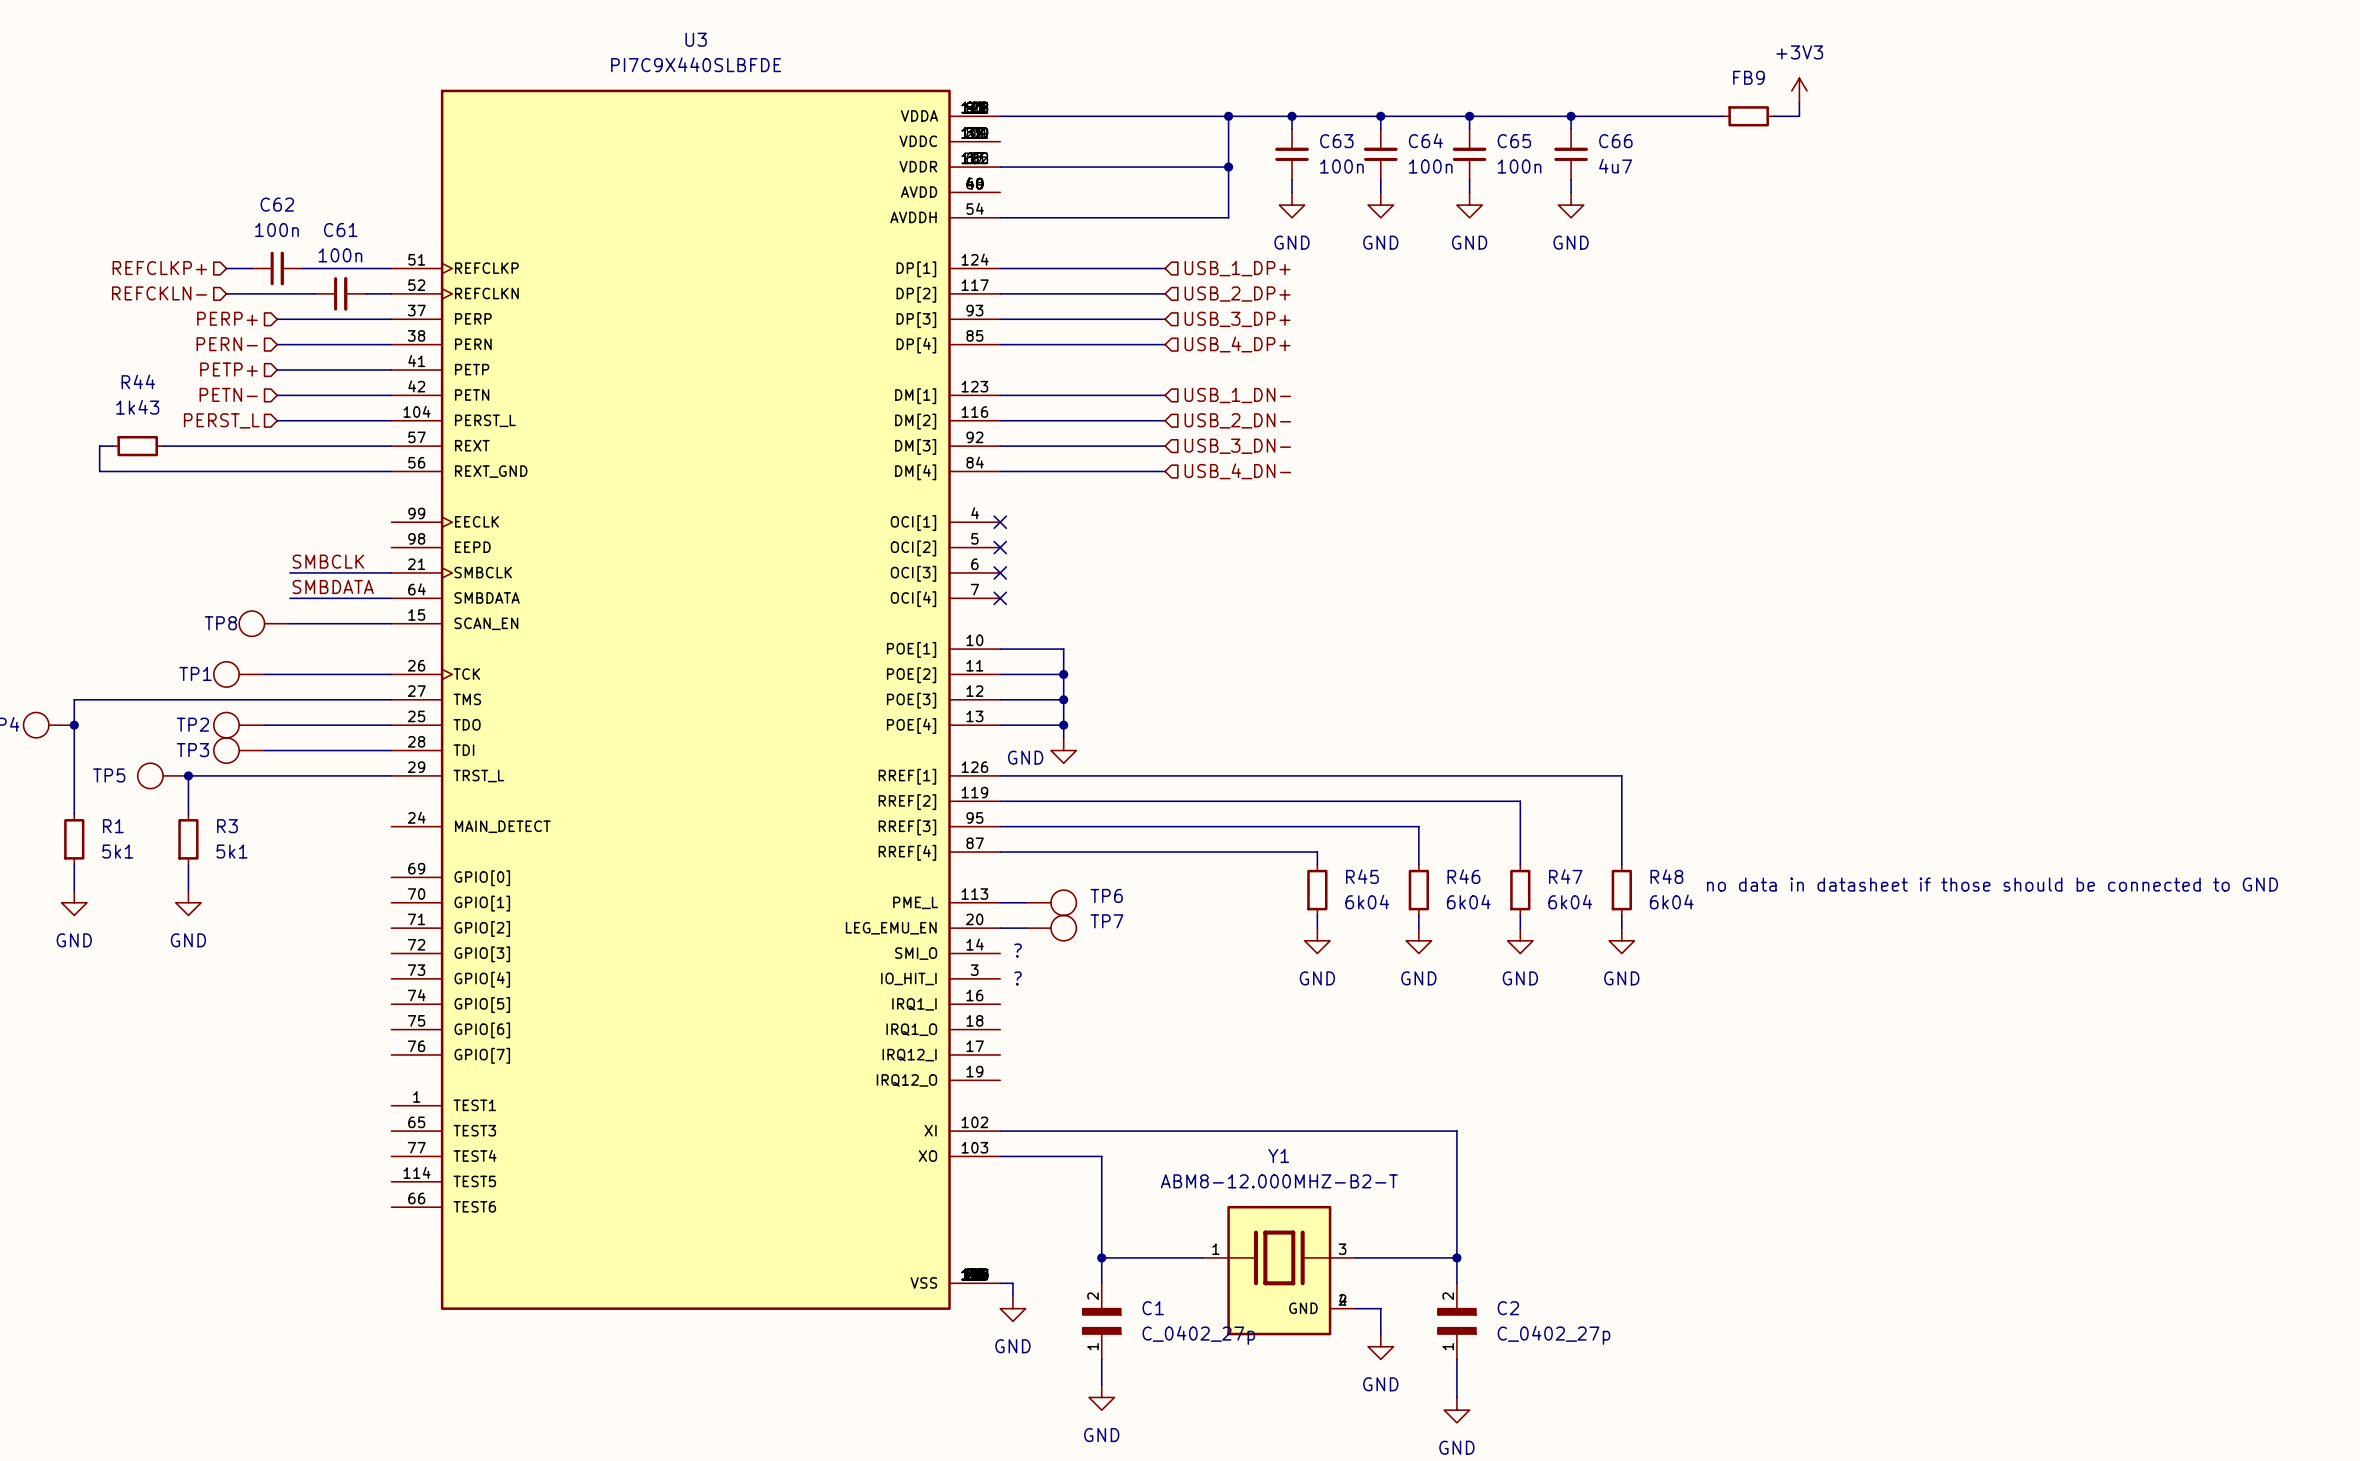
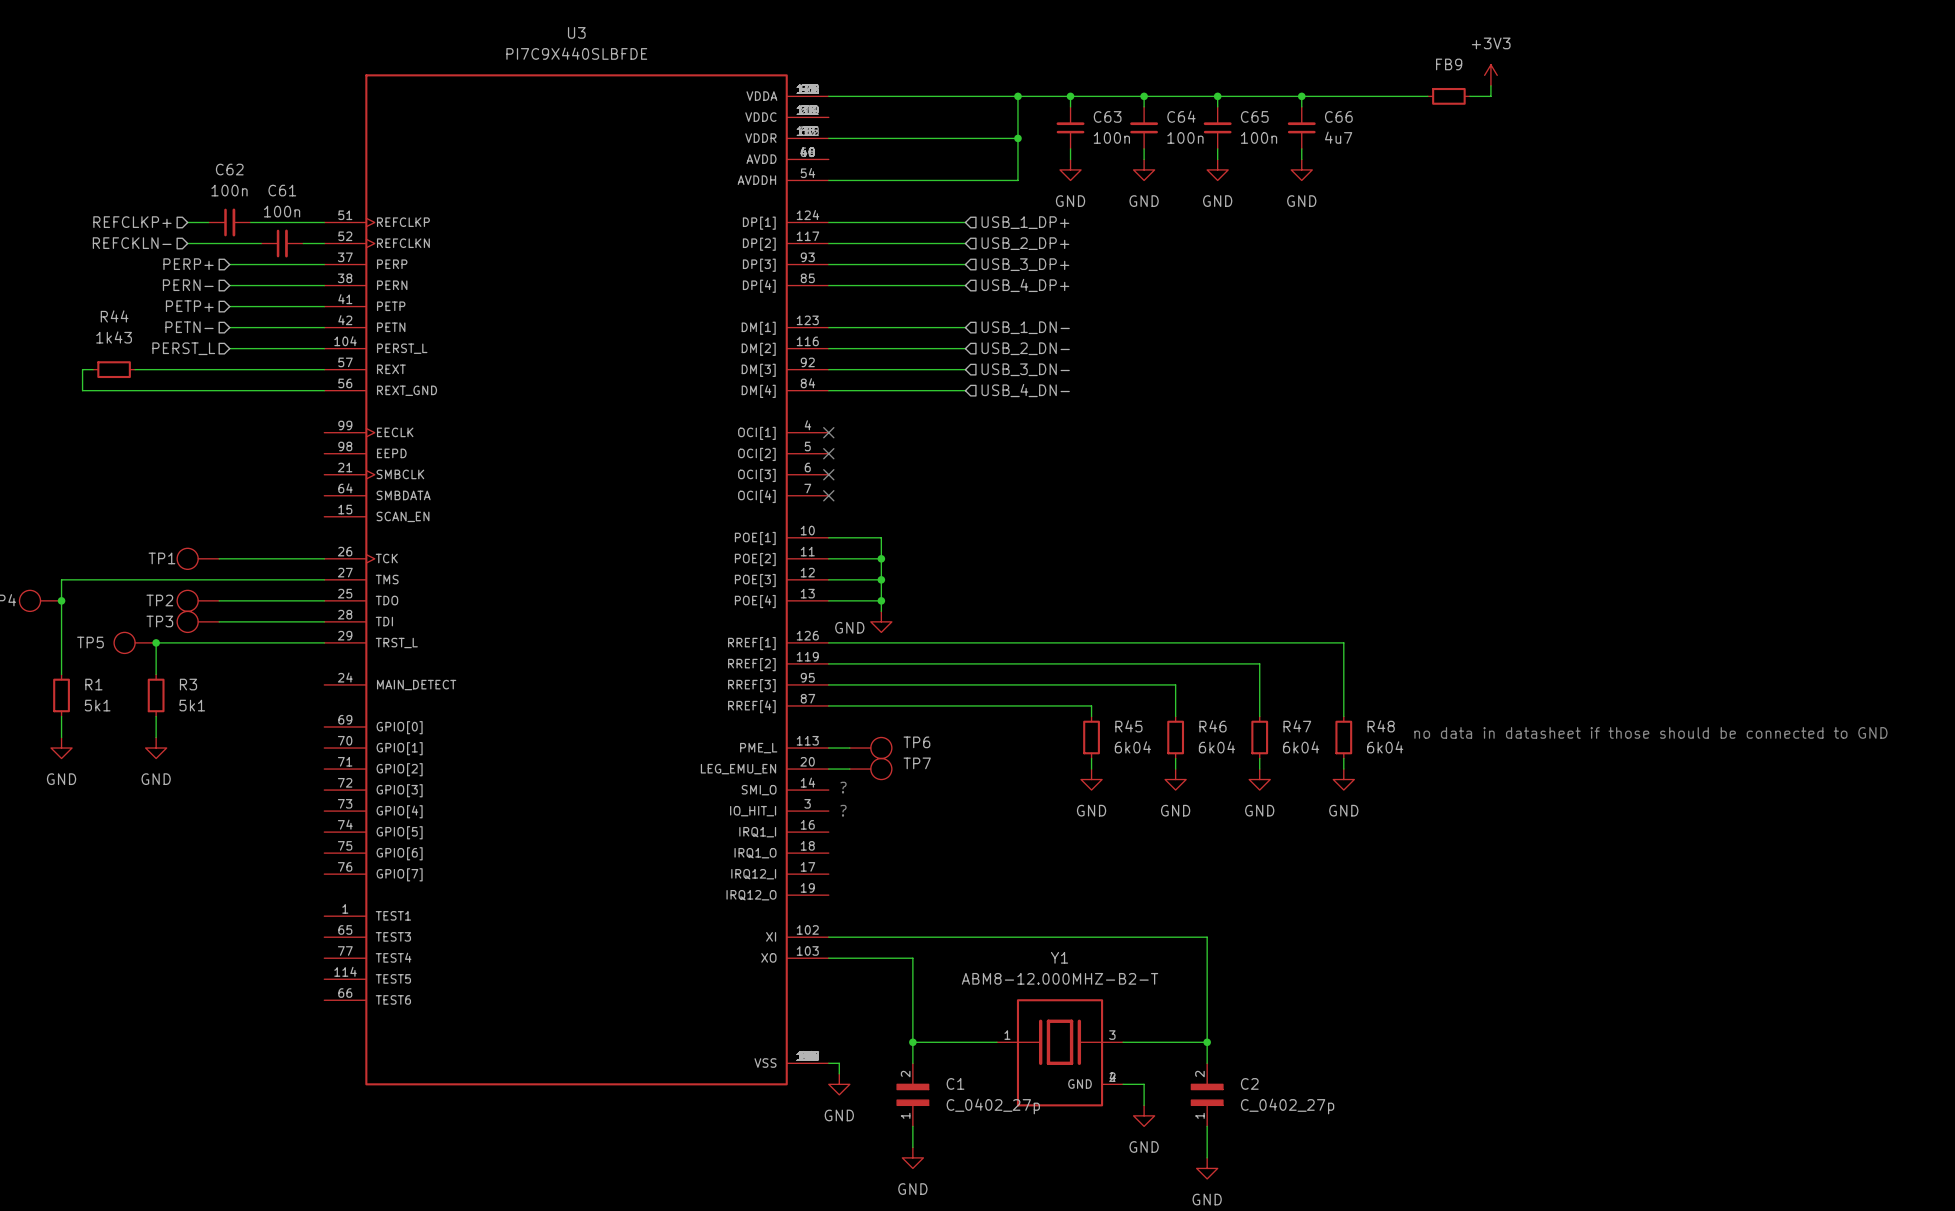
label: SMBCLK (328, 561) -> none
wire: (289, 572) (391, 572) -> none
label: SMBDATA (333, 587) -> none
wire: (289, 598) (391, 598) -> none
TP8: (264, 623) -> none
wire: (289, 623) (391, 623) -> none

